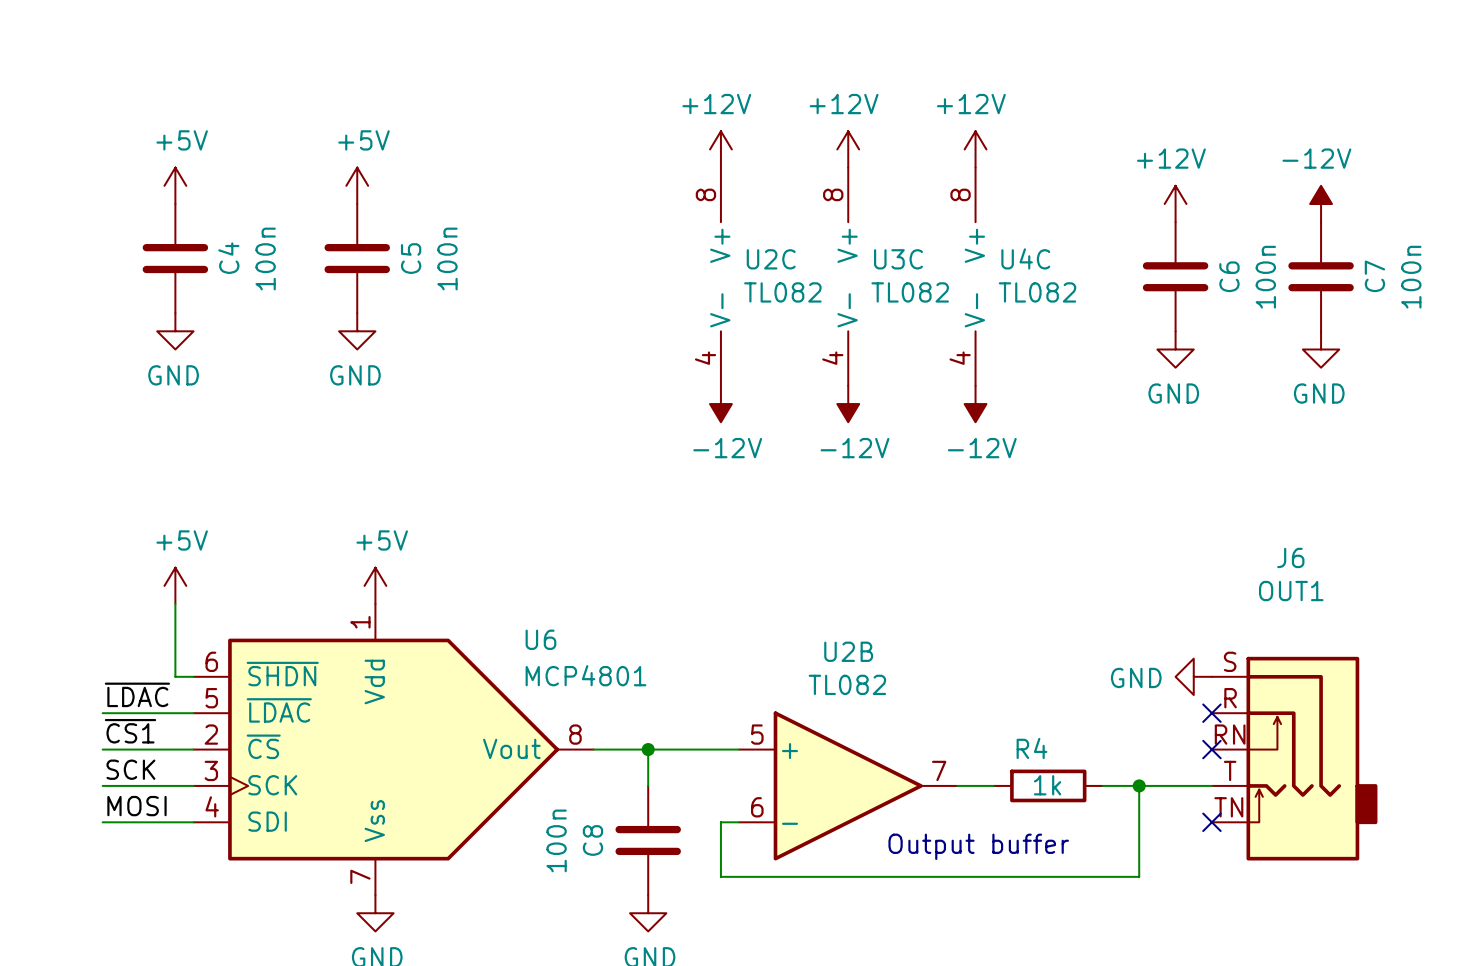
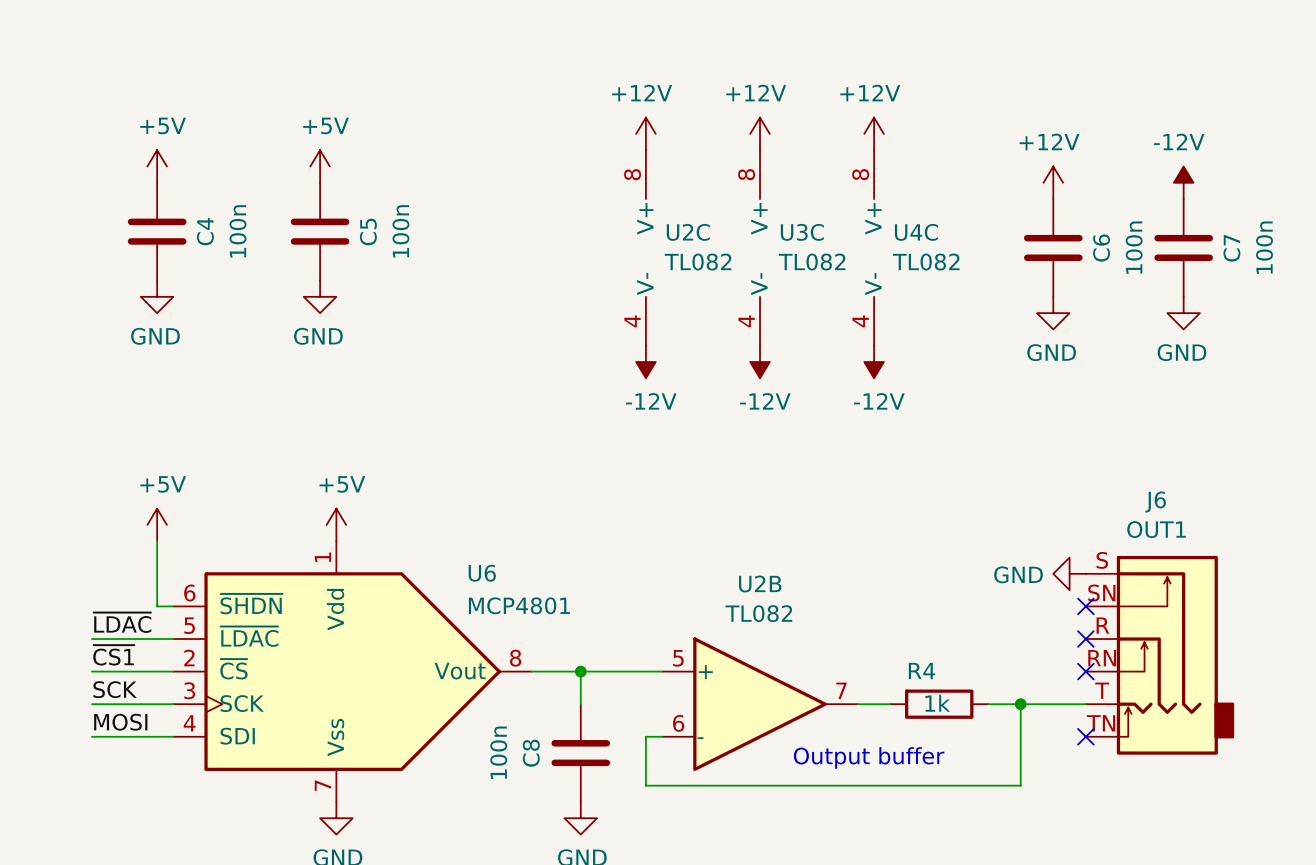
J6 symbol: [1211, 656, 1378, 861] -> [1085, 555, 1235, 755]
power symbol position: GND (1193, 676) -> GND (1069, 573)
no-connect mark: none -> (1085, 606)

